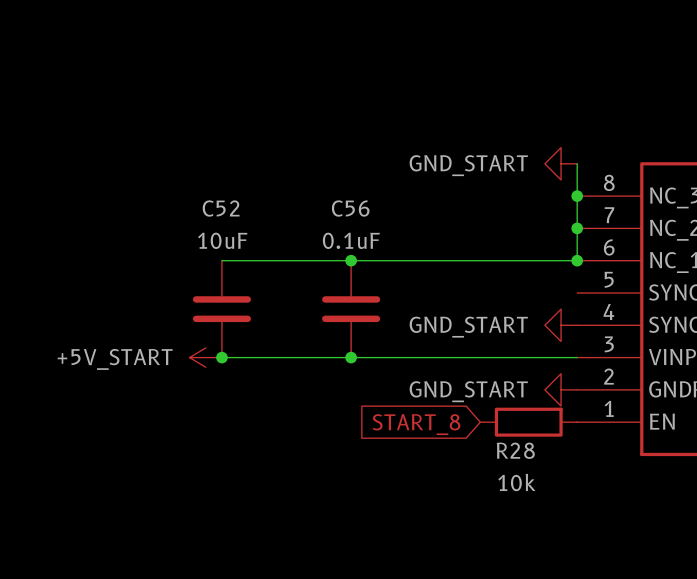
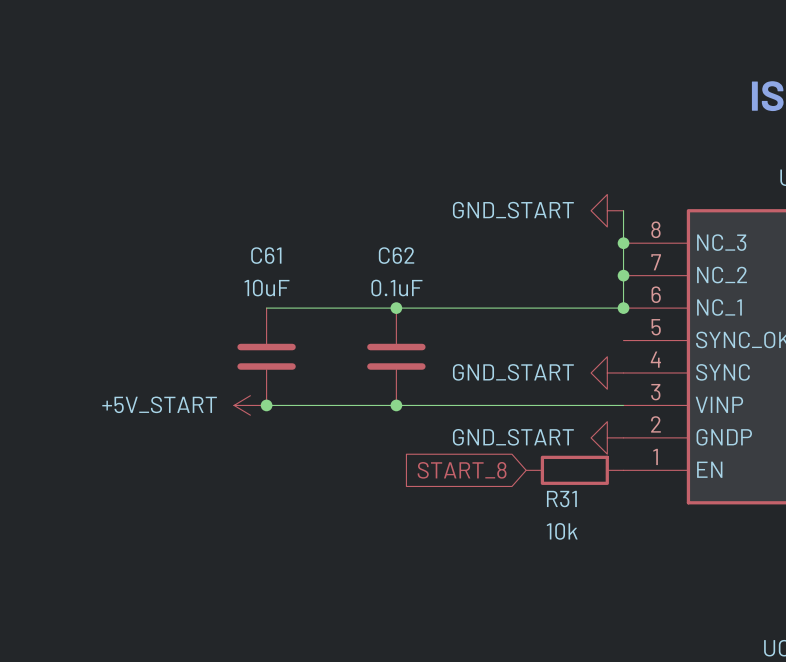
C52 name: C52 (221, 208) -> C61 (266, 255)
C56 name: C56 (350, 208) -> C62 (396, 255)
R28 name: R28 (515, 450) -> R31 (561, 499)

